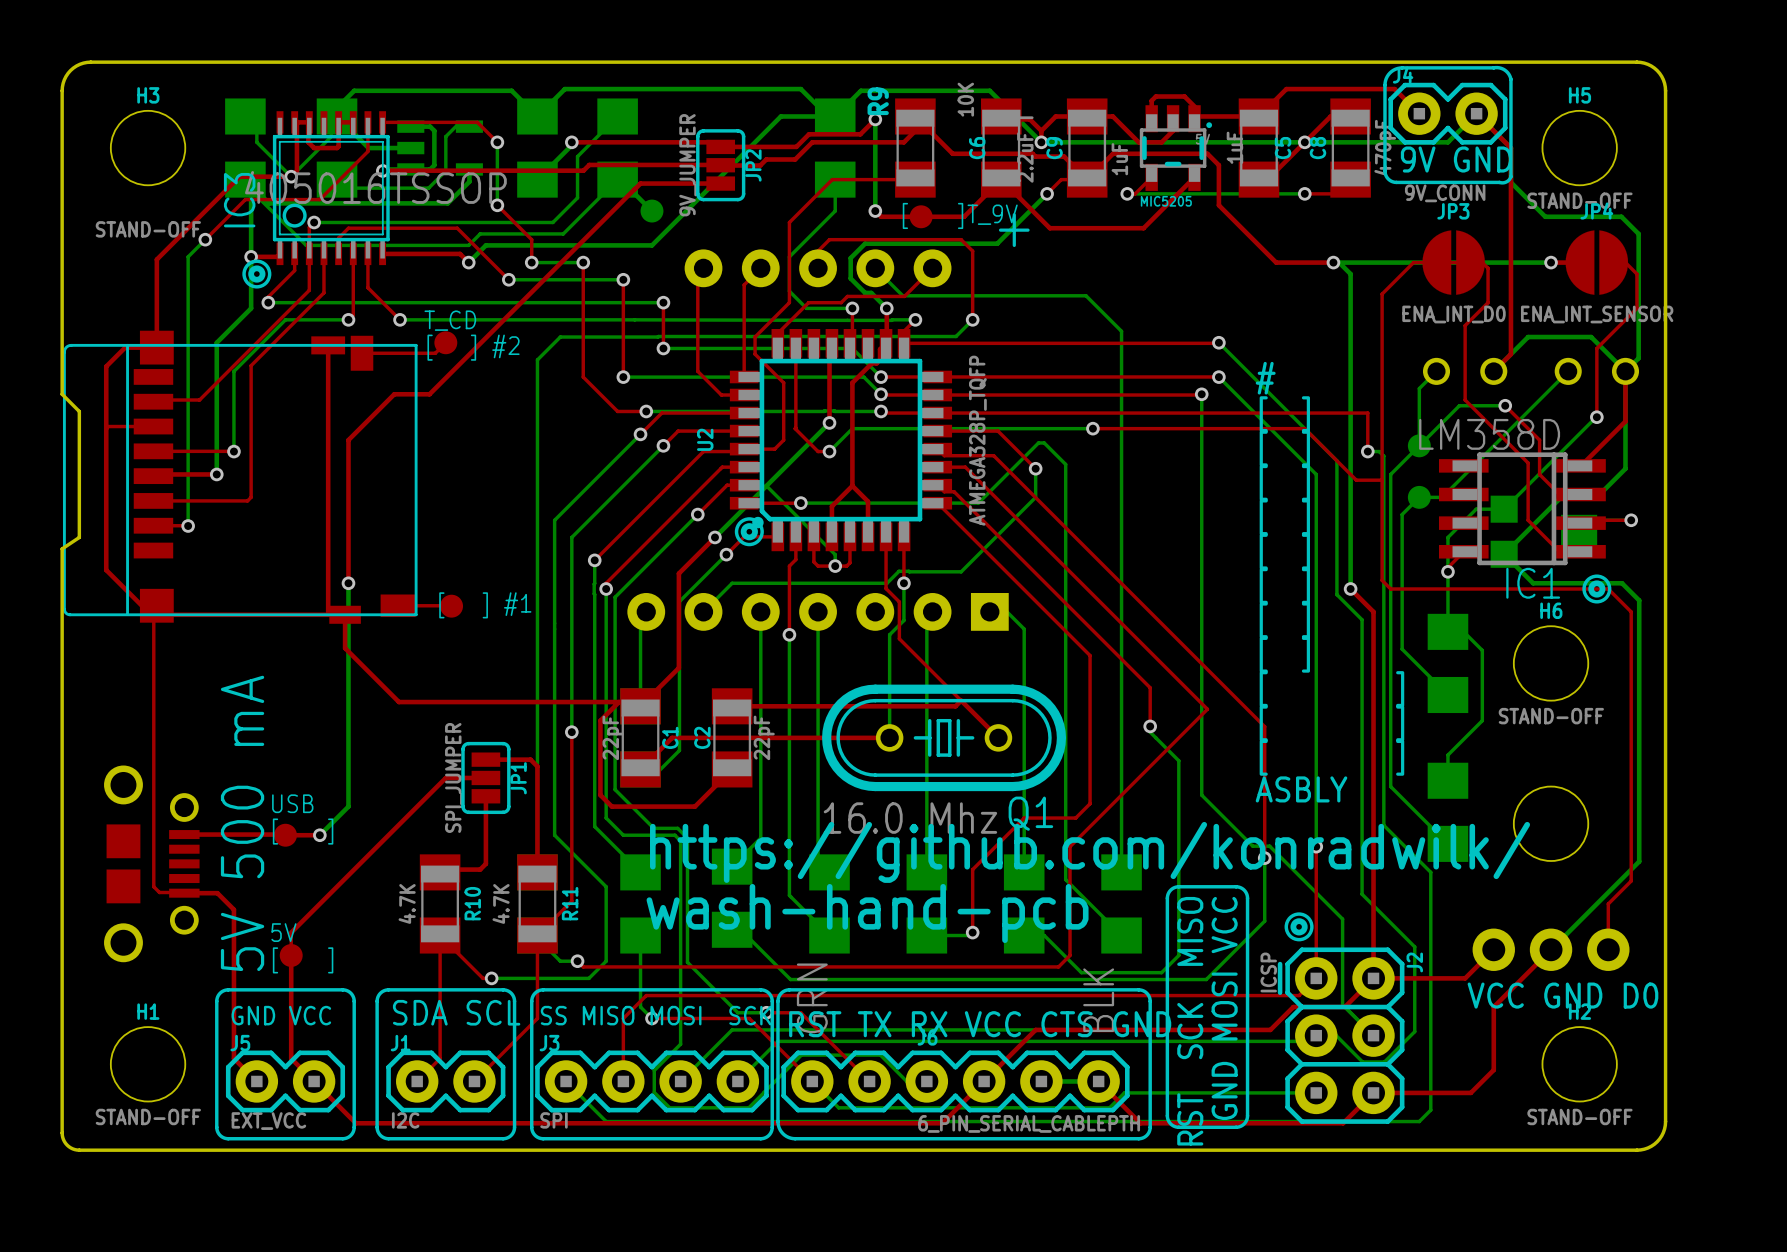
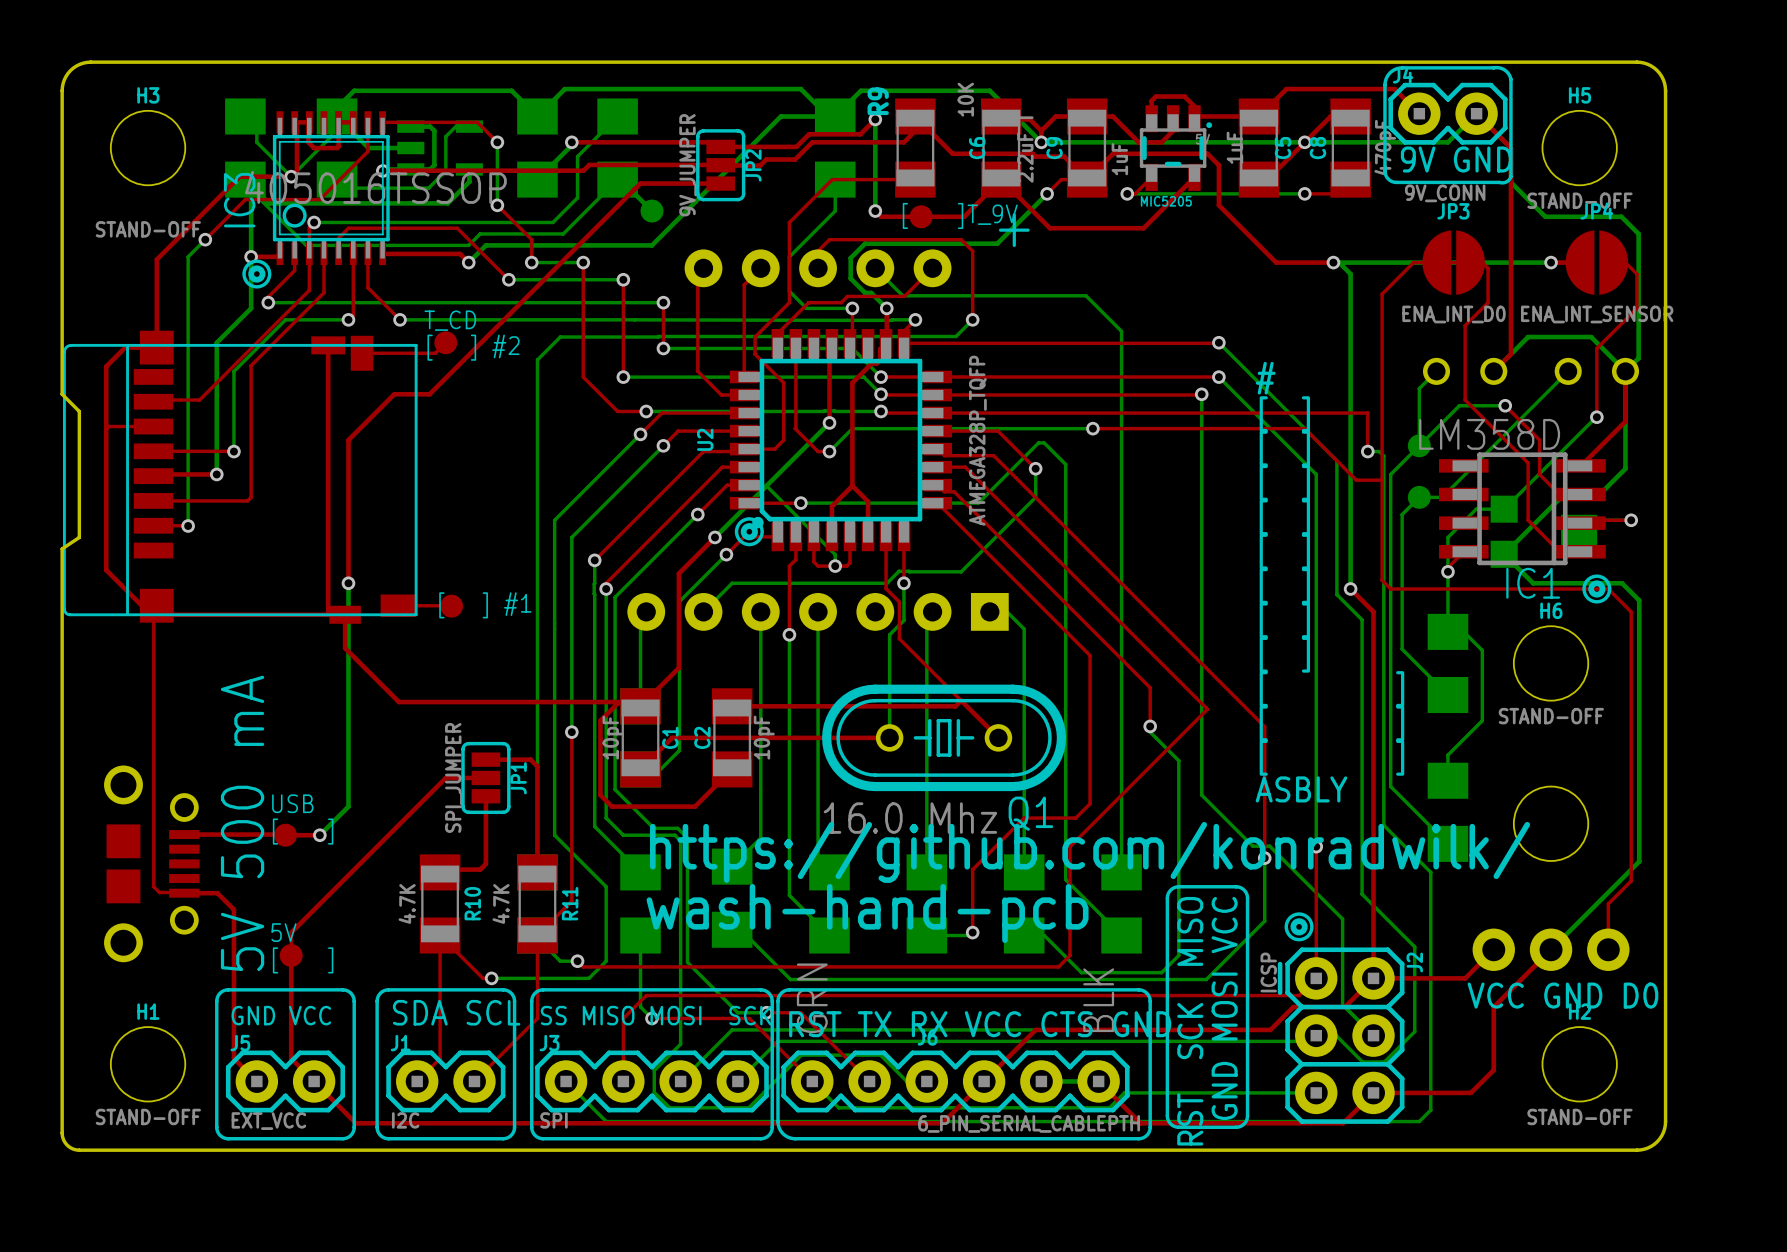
C1 value: 22pF (613, 737) -> 10pF (613, 737)
C2 value: 22pF (764, 737) -> 10pF (764, 737)

